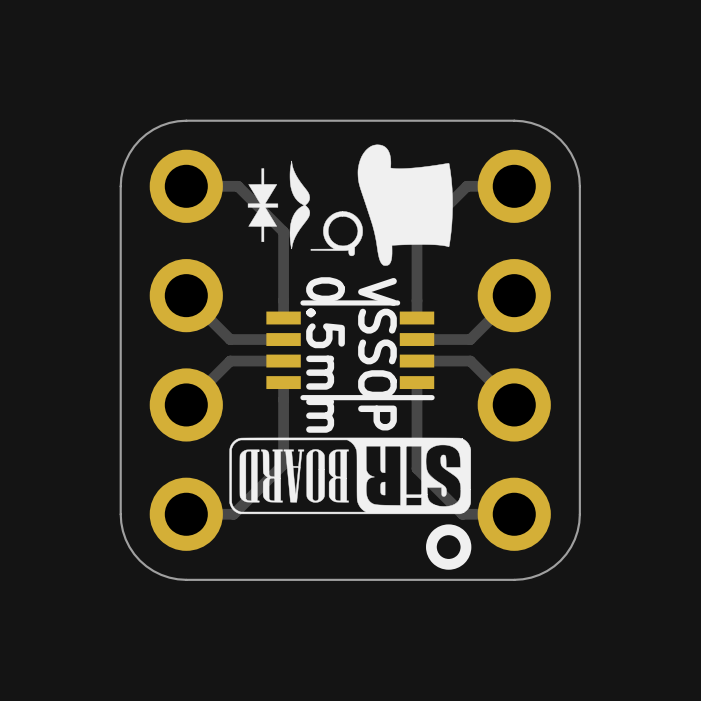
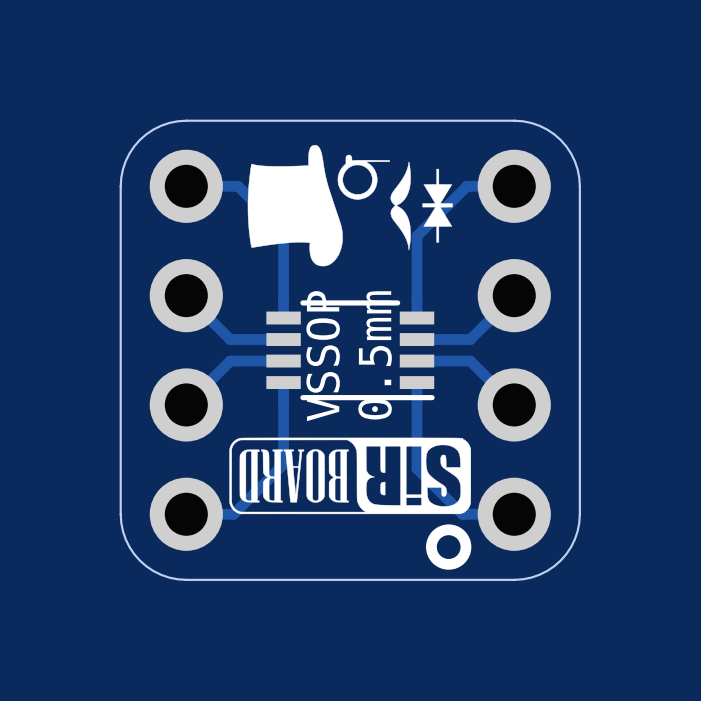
drawing shape: [247, 144, 453, 266] -> [247, 145, 453, 267]
text: 0.5mm (325, 354) -> VSSOP (323, 356)
text: VSSOP (377, 354) -> 0.5mm (375, 355)

